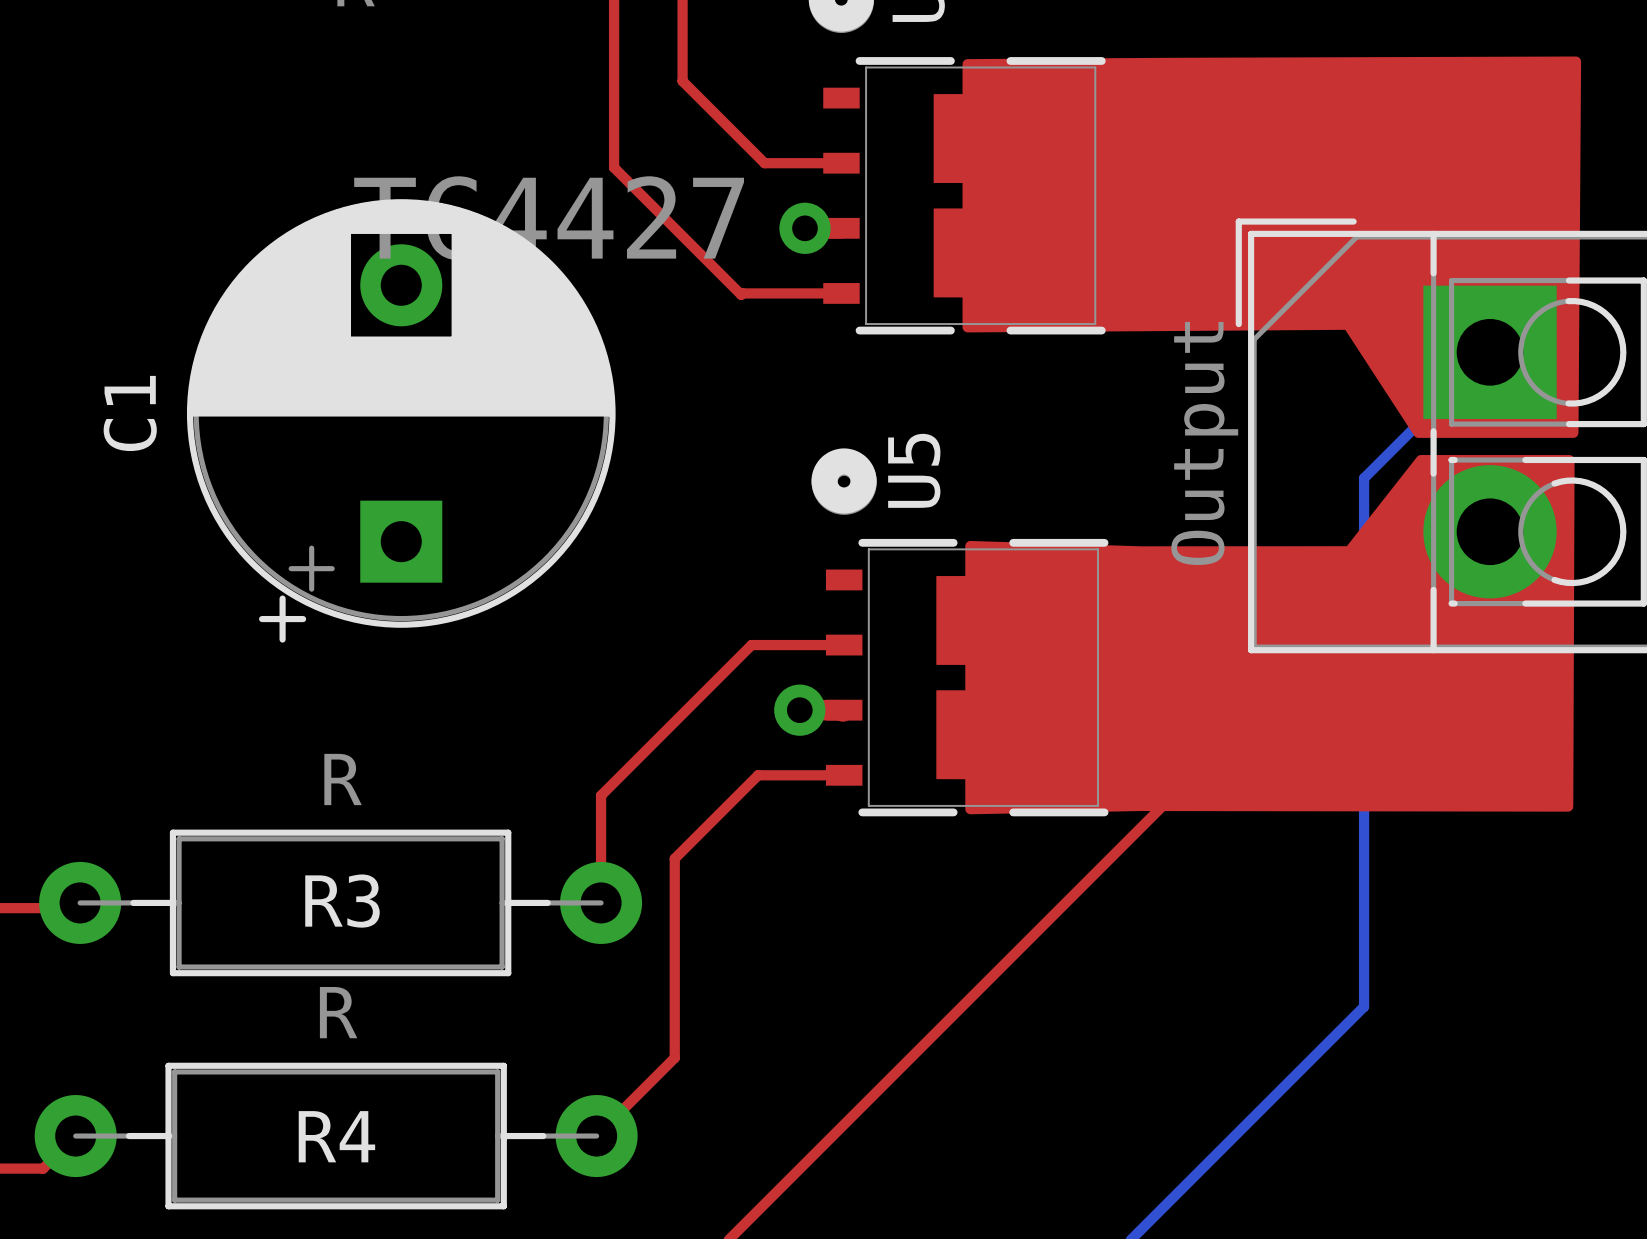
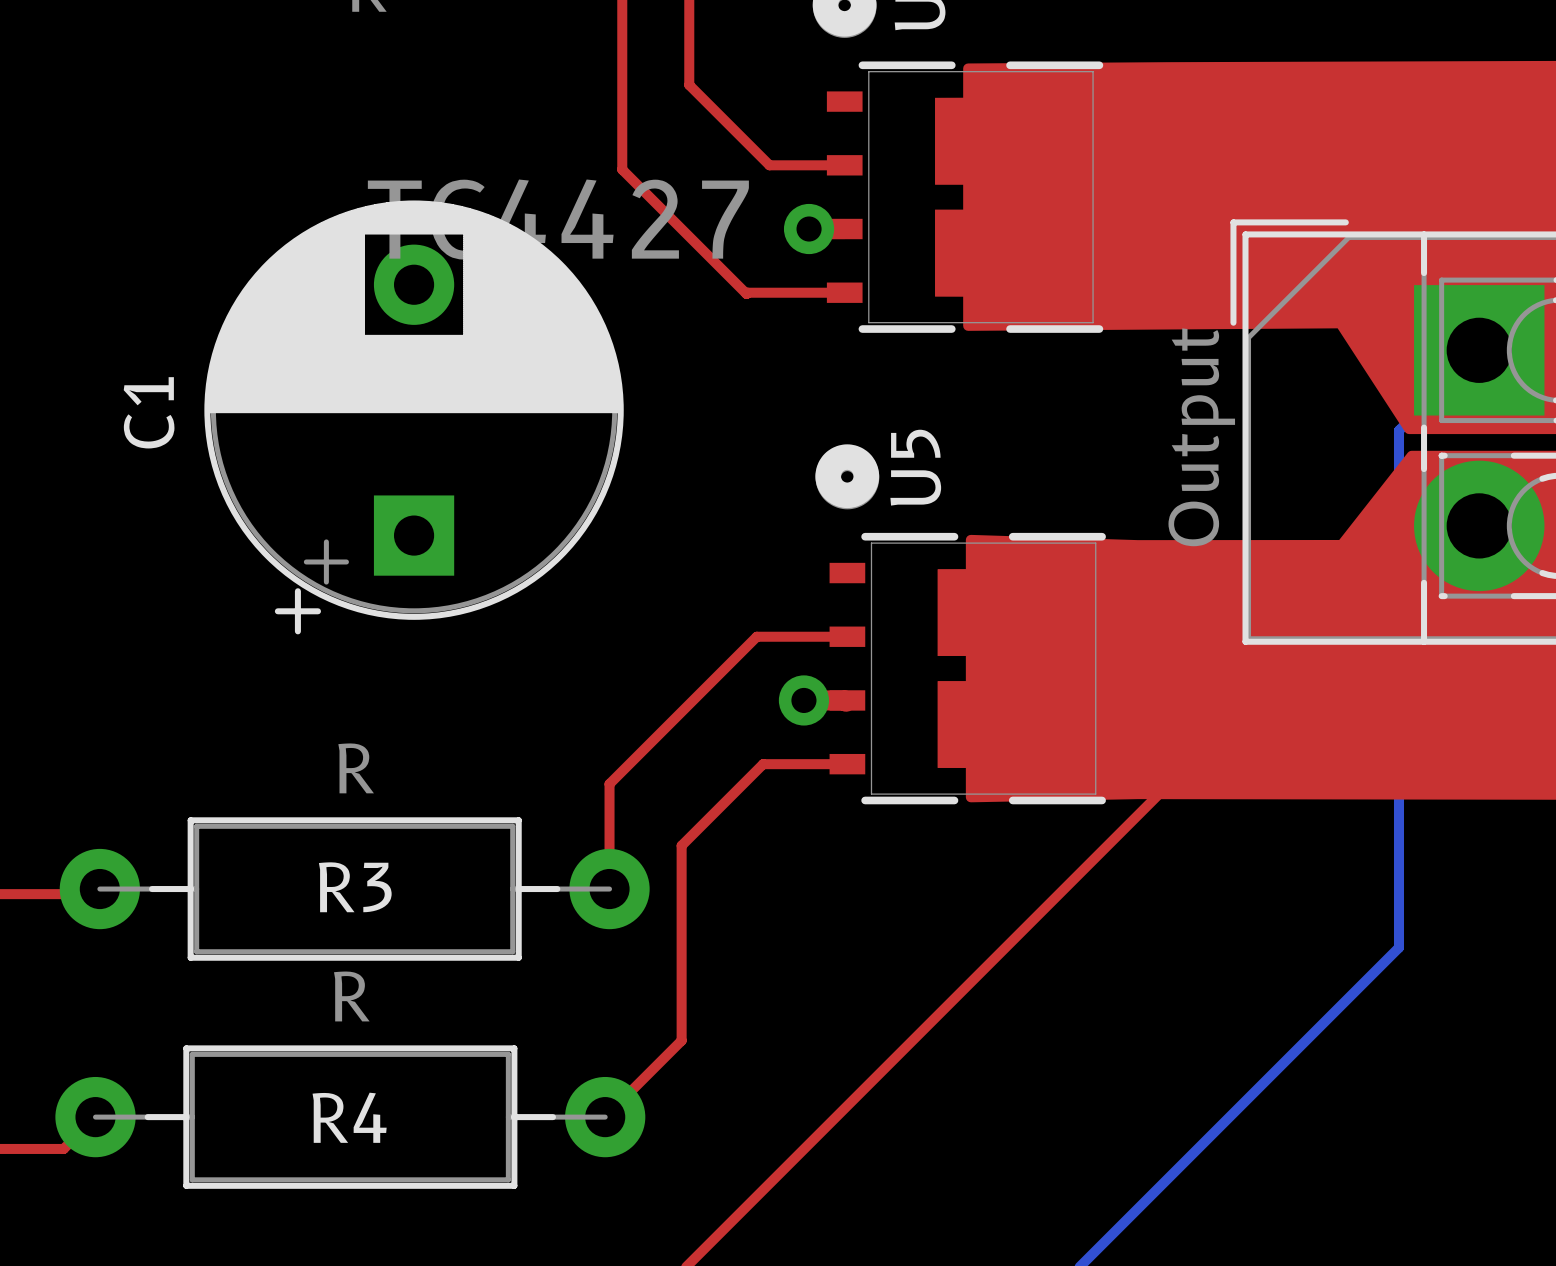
bottom track: (1407, 434) (1364, 478) (1364, 1006) -> (1398, 430) (1398, 947) (1356, 990)

